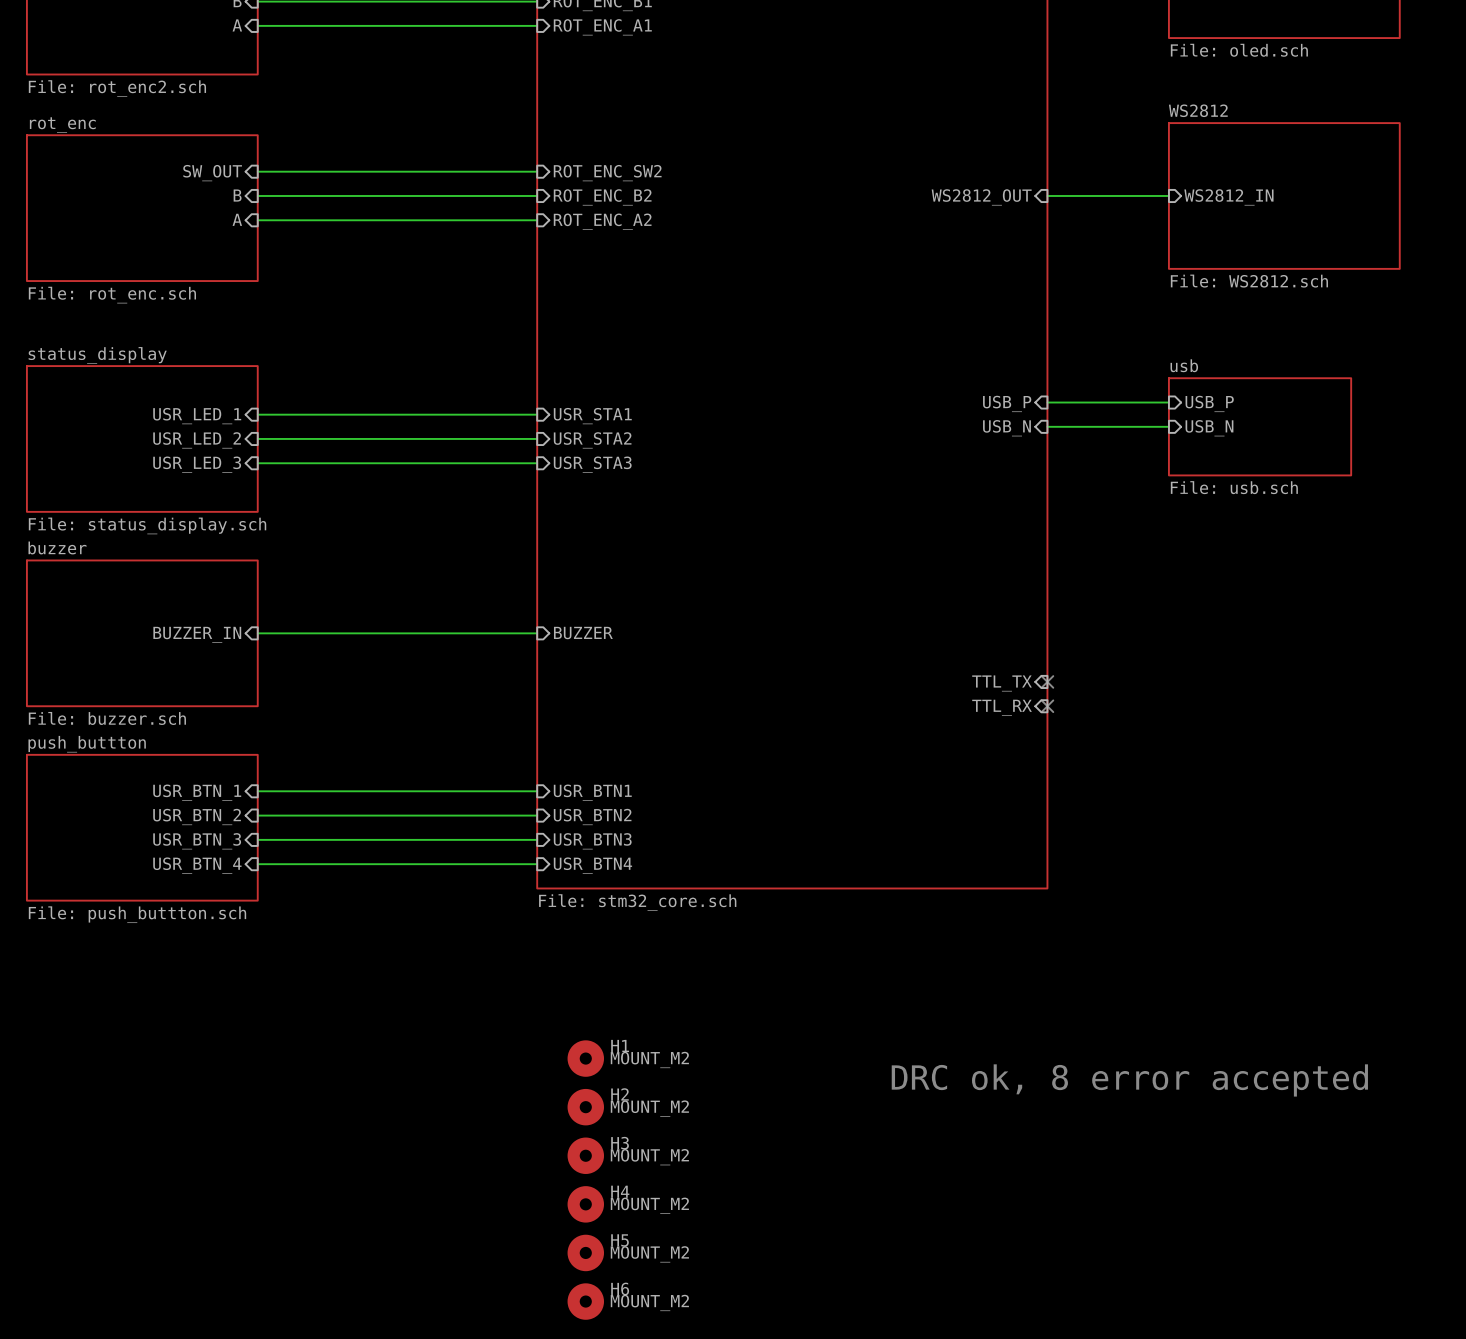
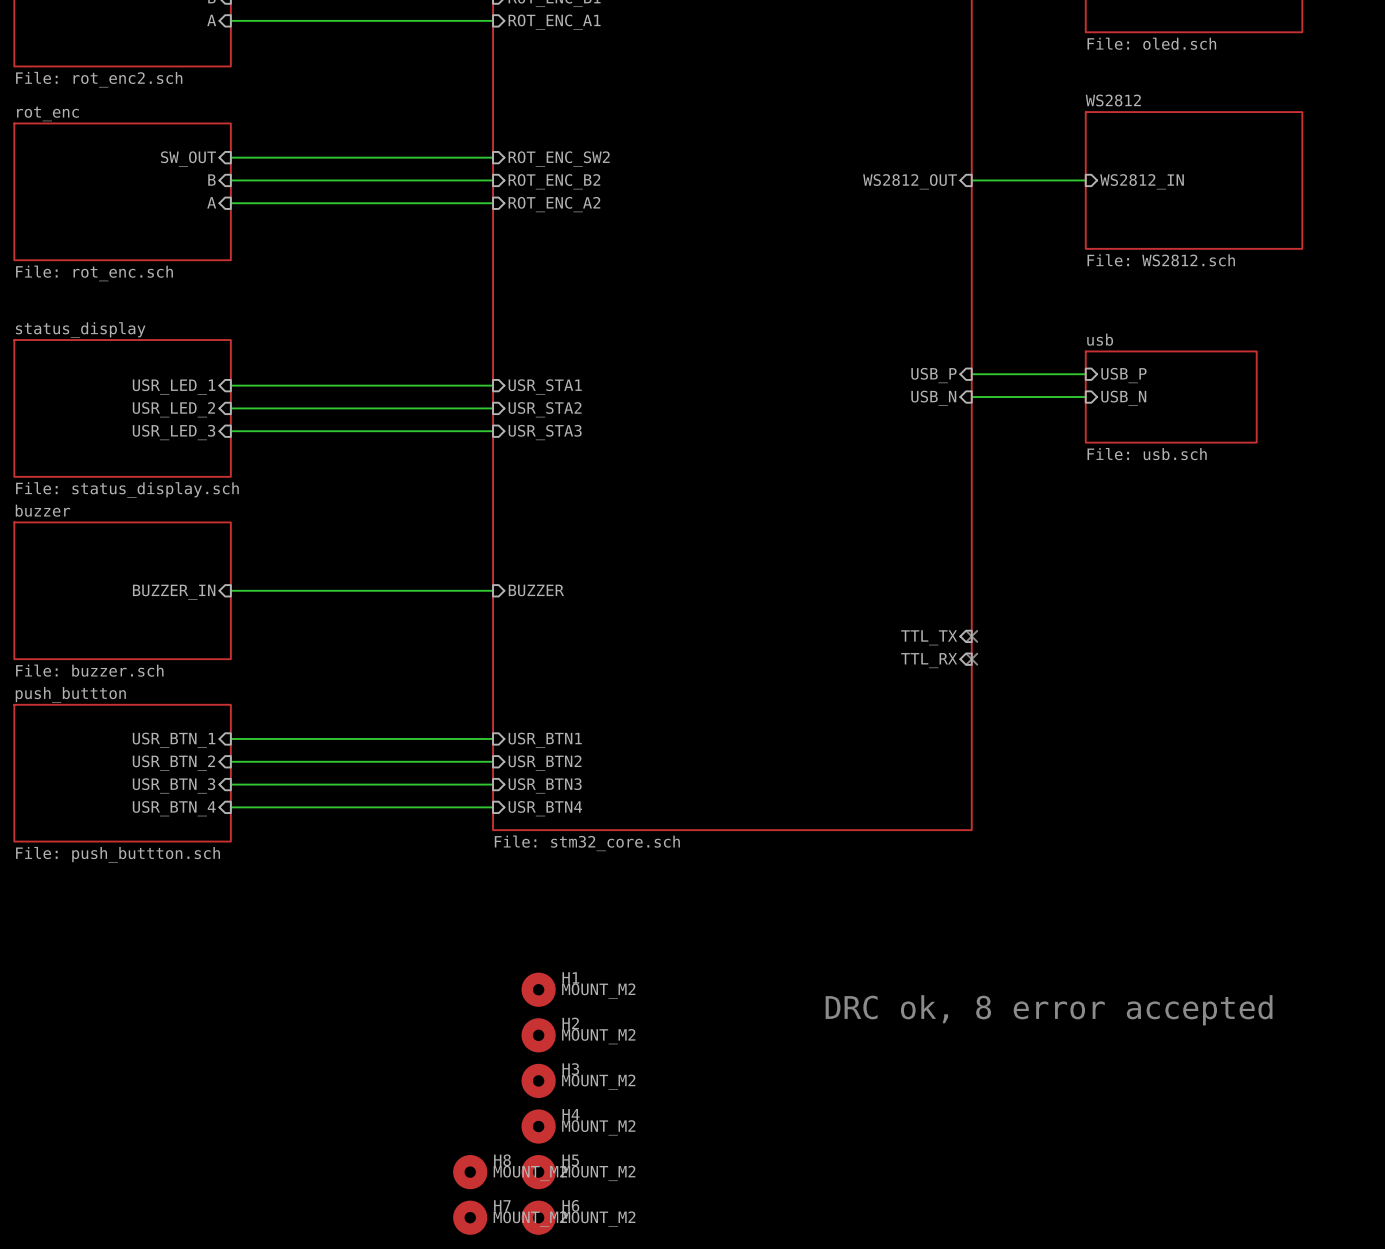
H8: none -> MOUNT_M2 (470, 1172)
H7: none -> MOUNT_M2 (470, 1217)

